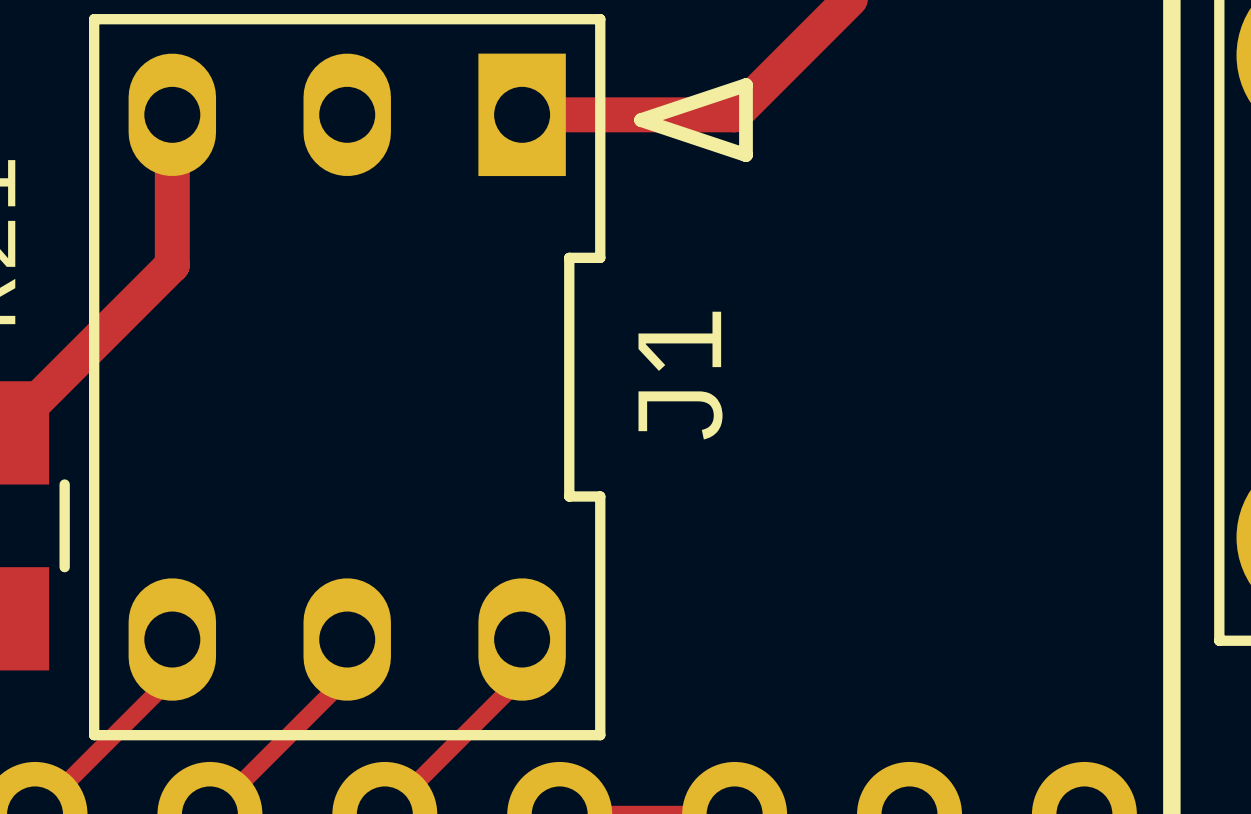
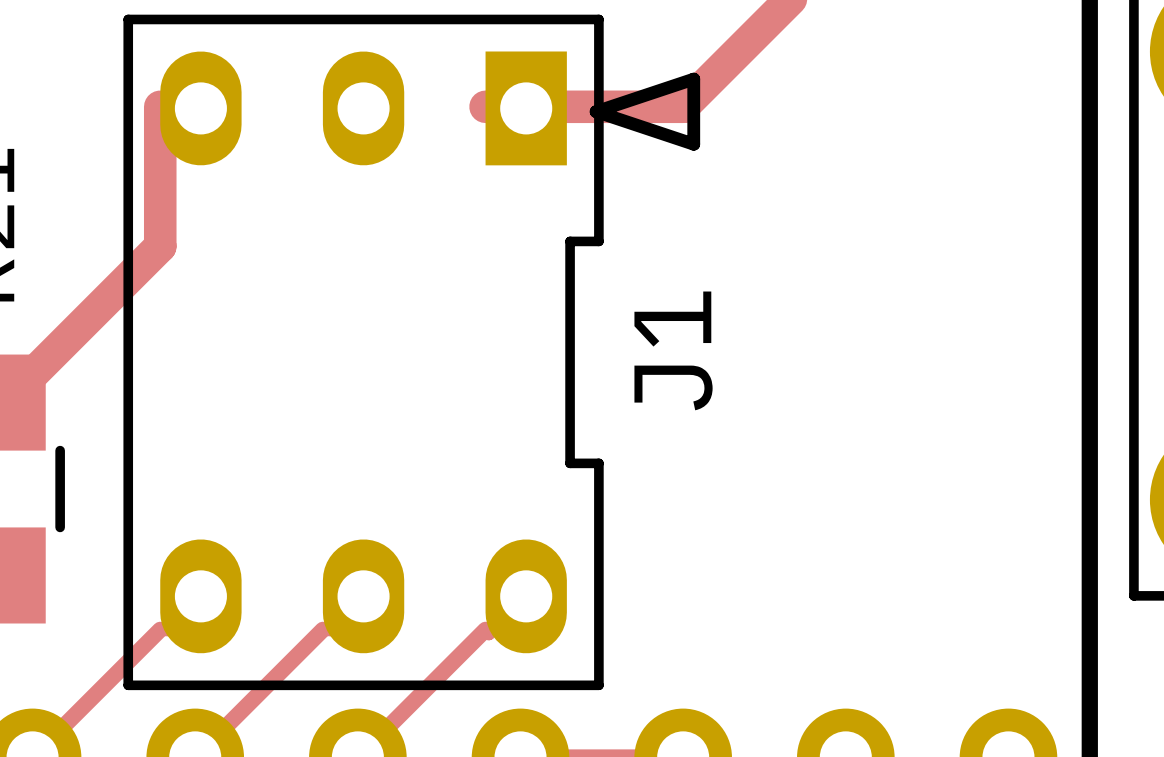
J1 position: (347, 377) -> (363, 352)

